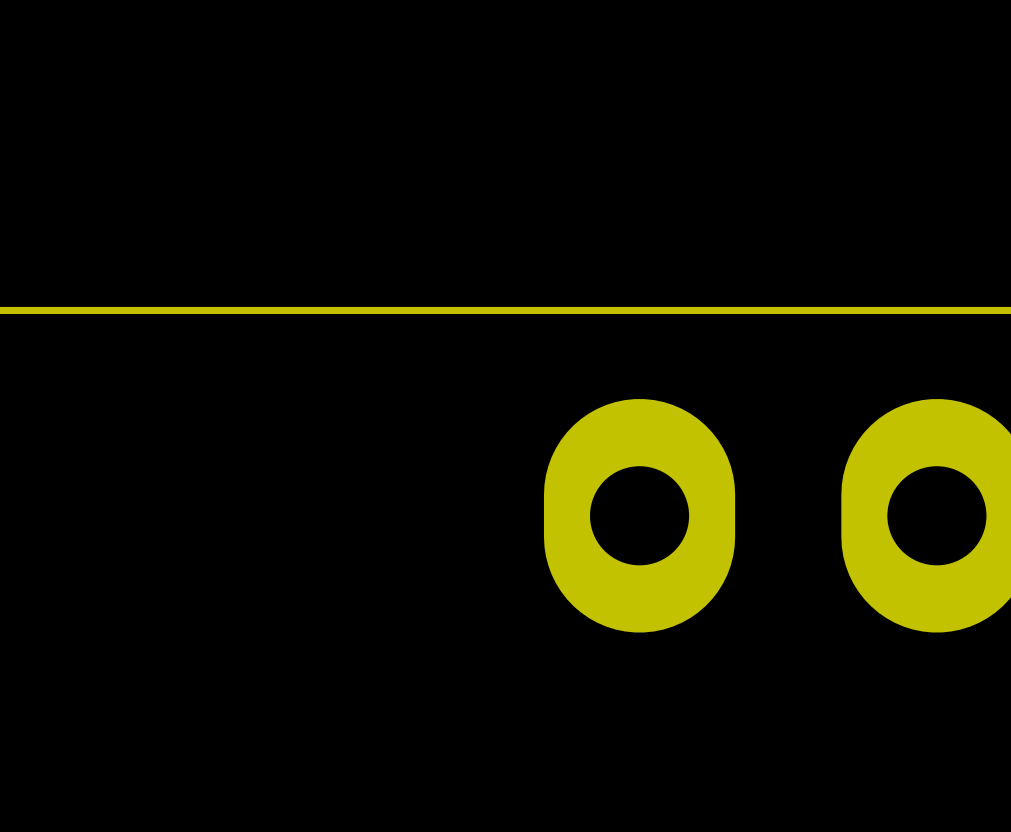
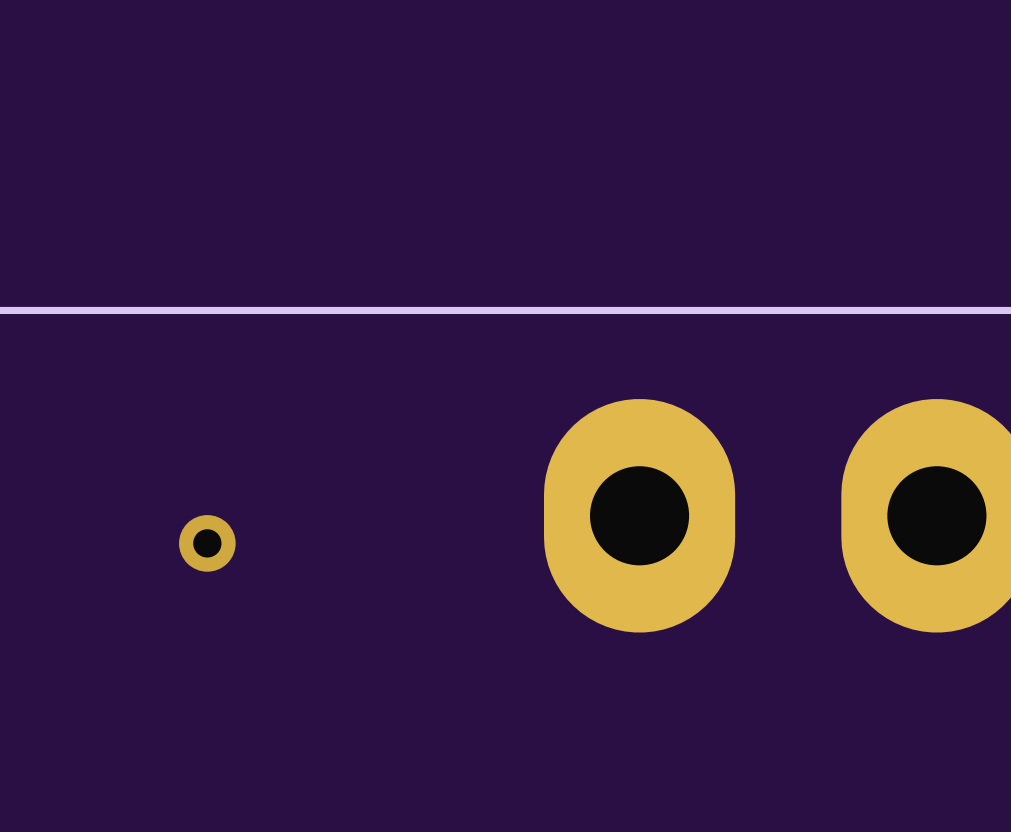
via: none -> (207, 543)

